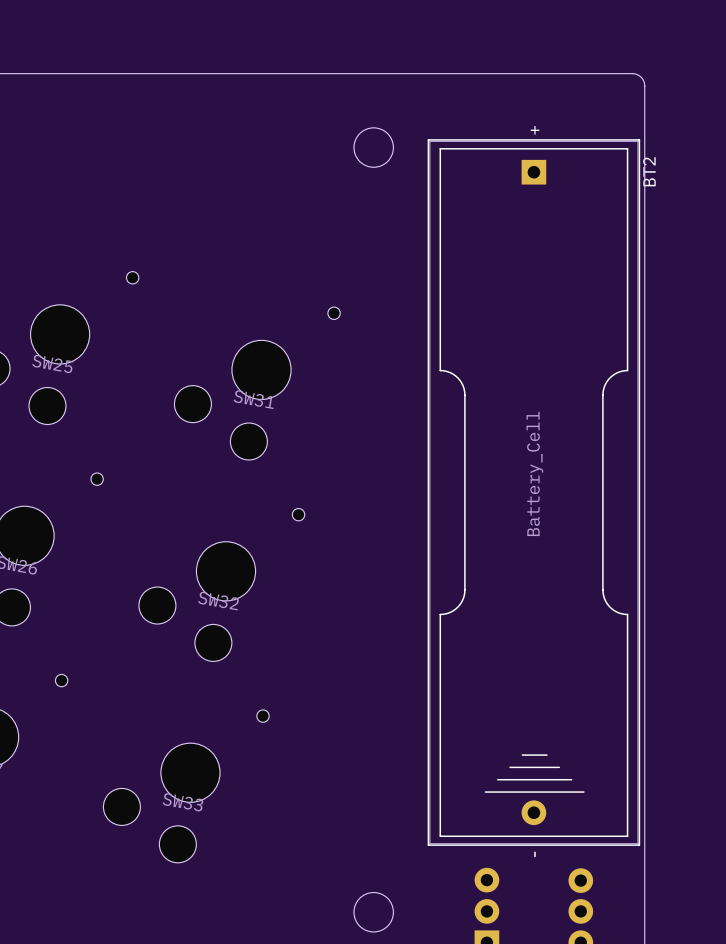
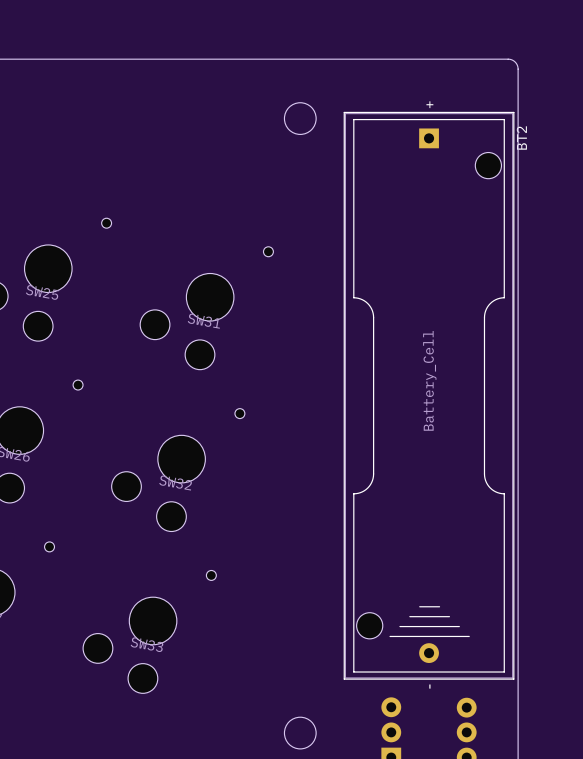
BT2 footprint: [427, 139, 641, 846] -> [343, 111, 515, 680]

